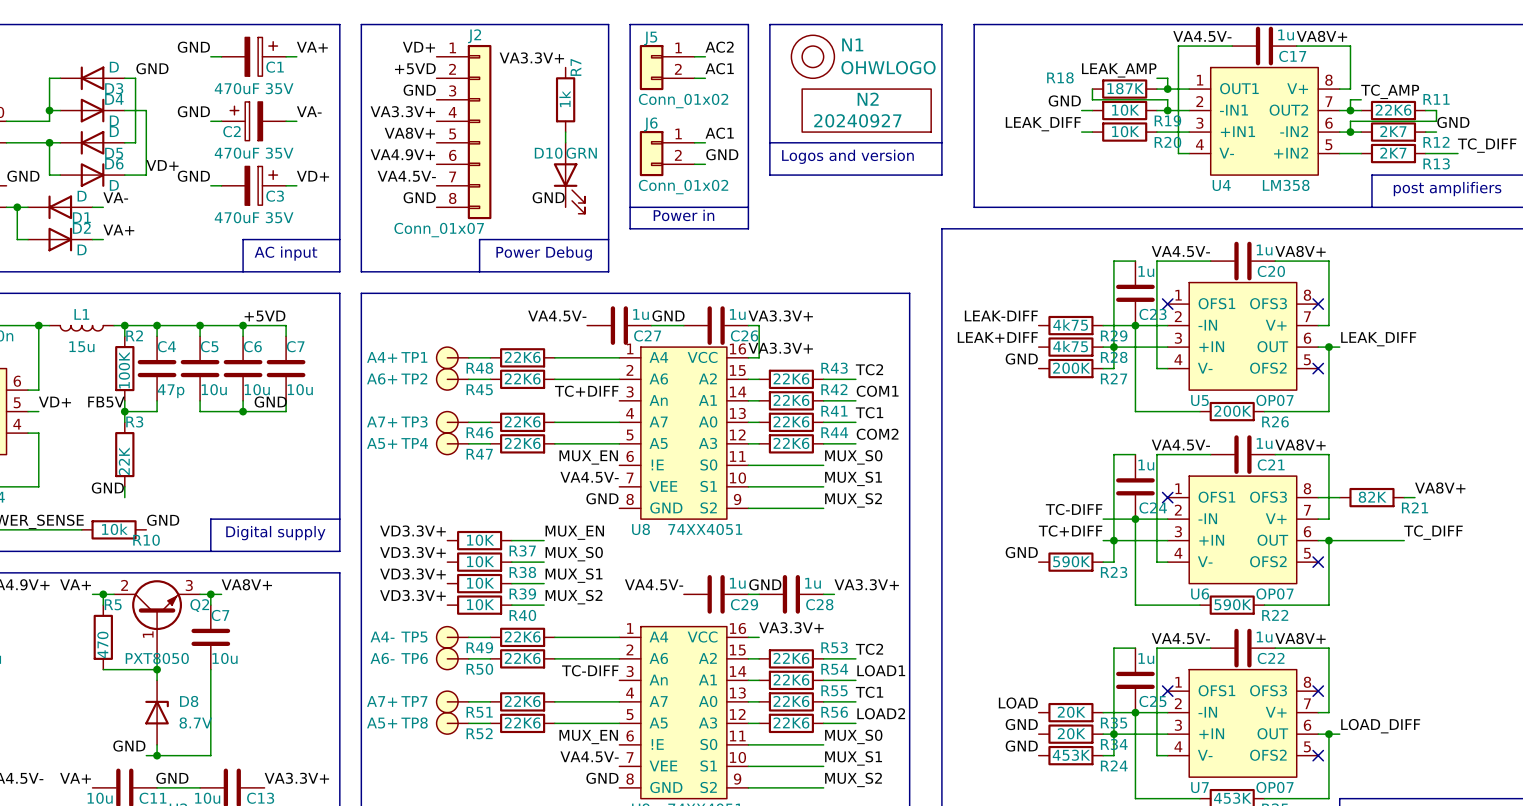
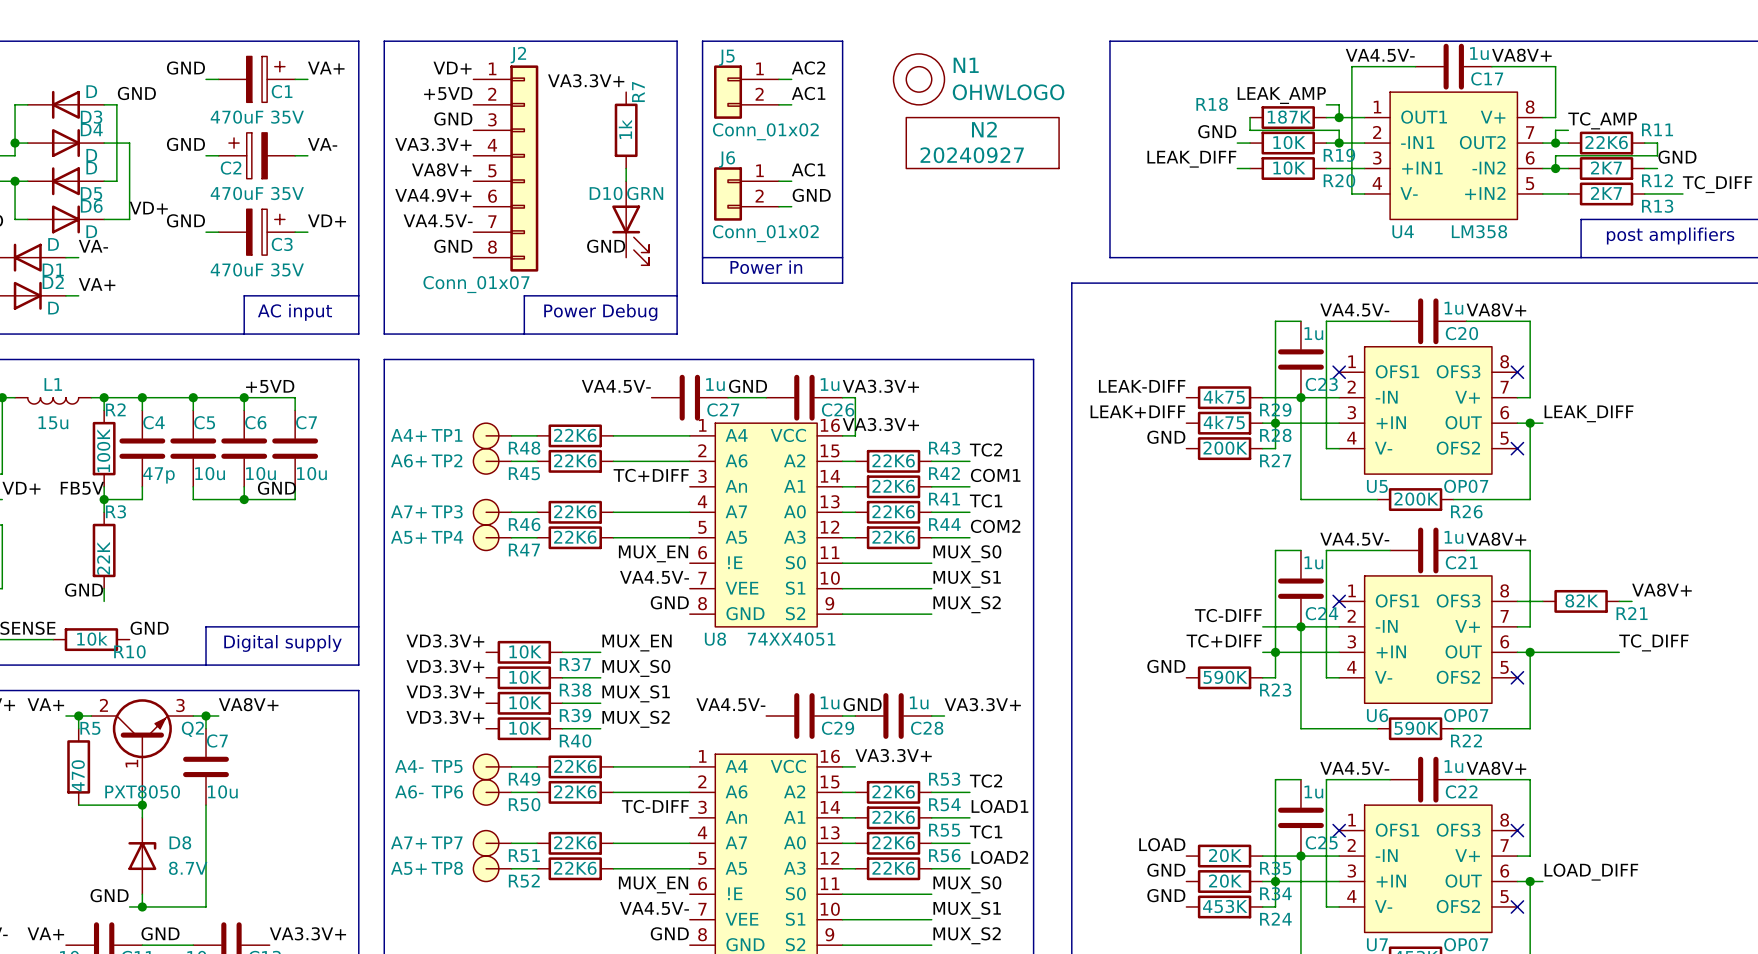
line: (769, 24) (769, 175) (941, 175) (941, 24) (769, 24) -> none
line: (769, 142) (941, 142) -> none
text: Logos and version (847, 156) -> none

